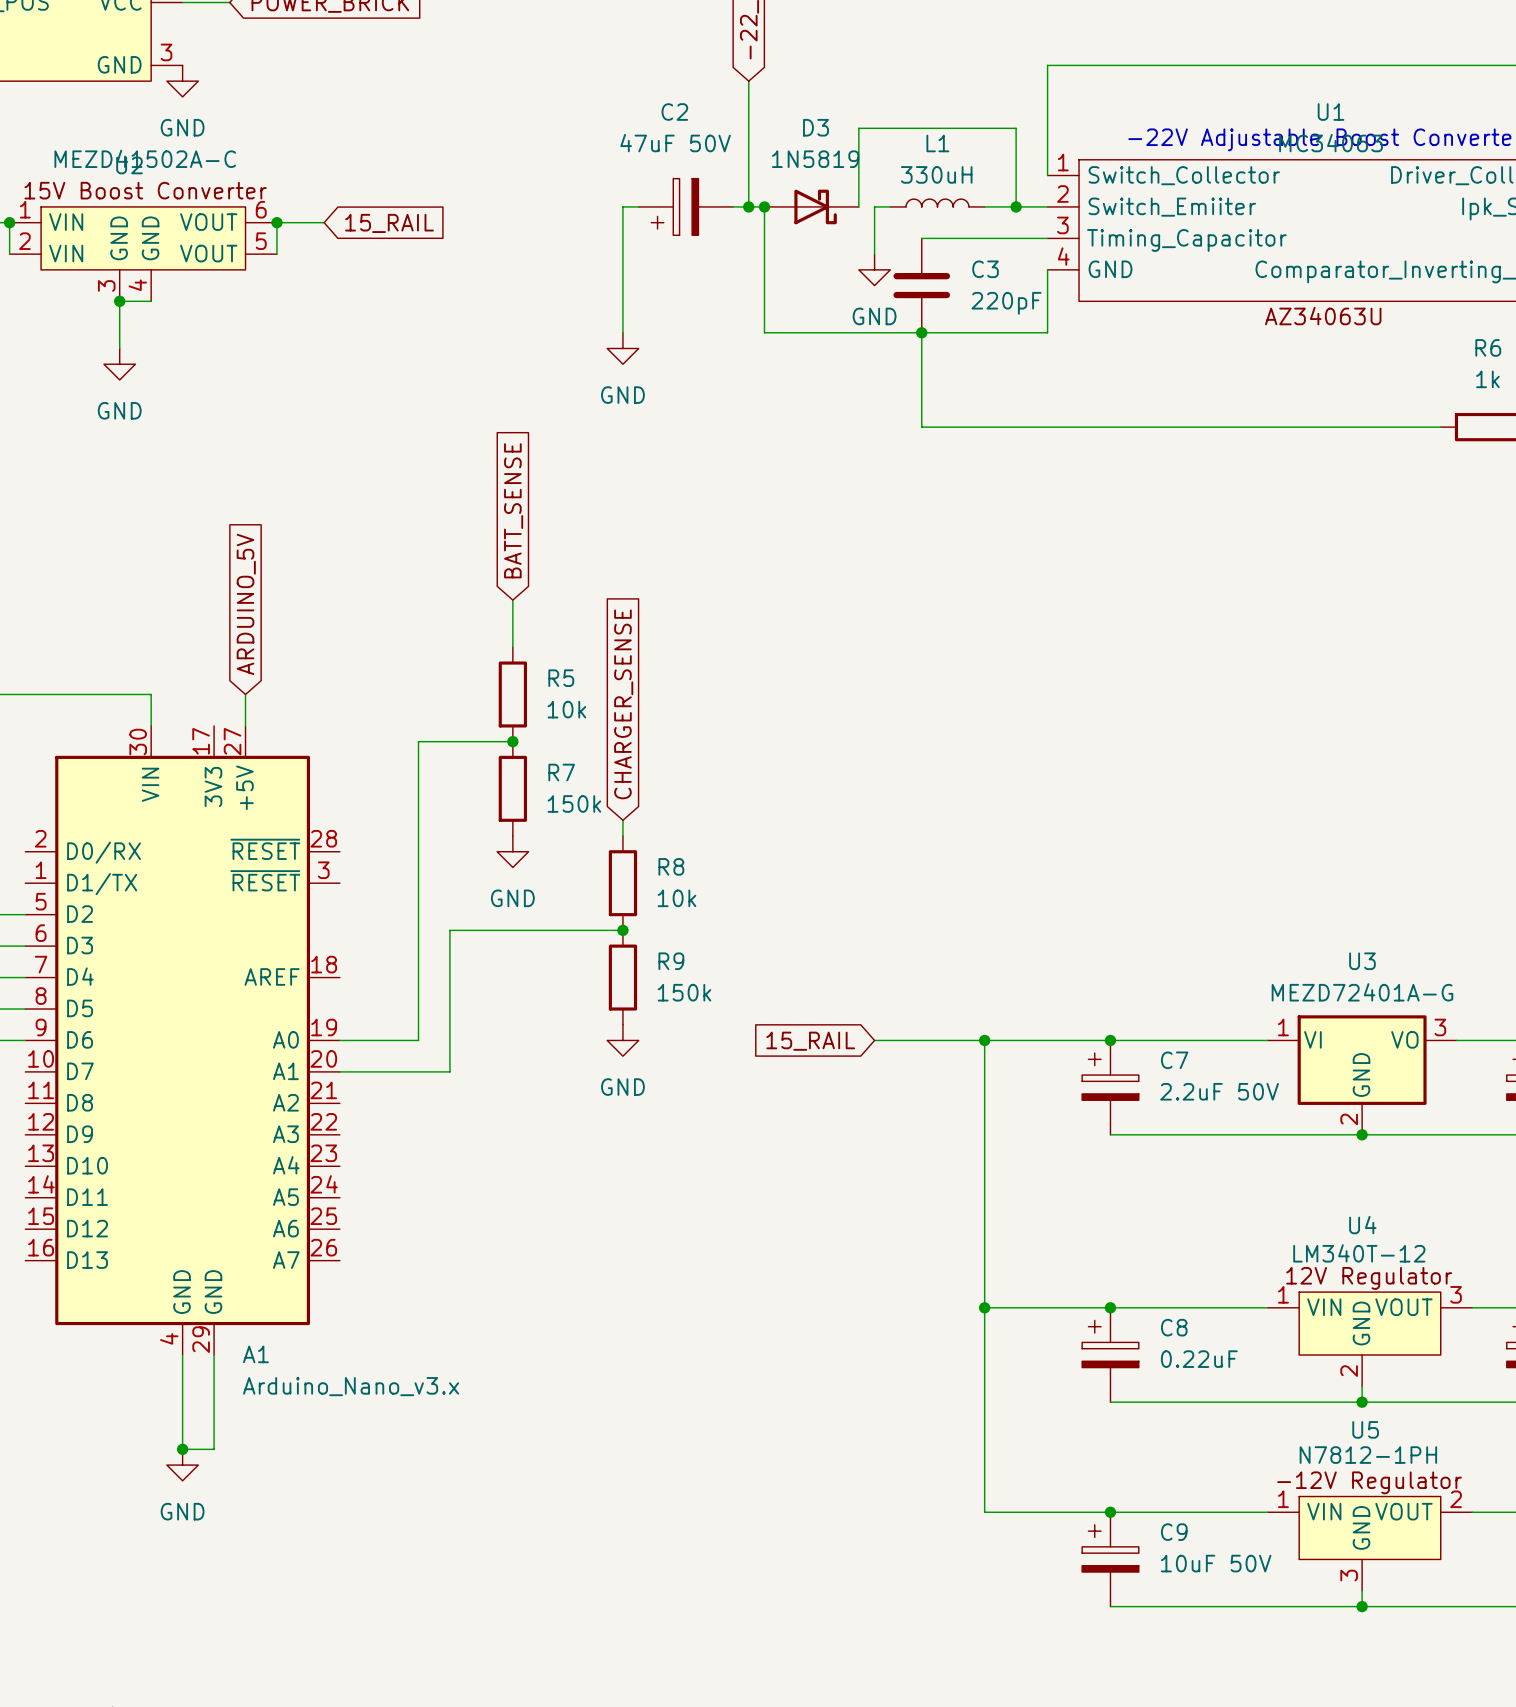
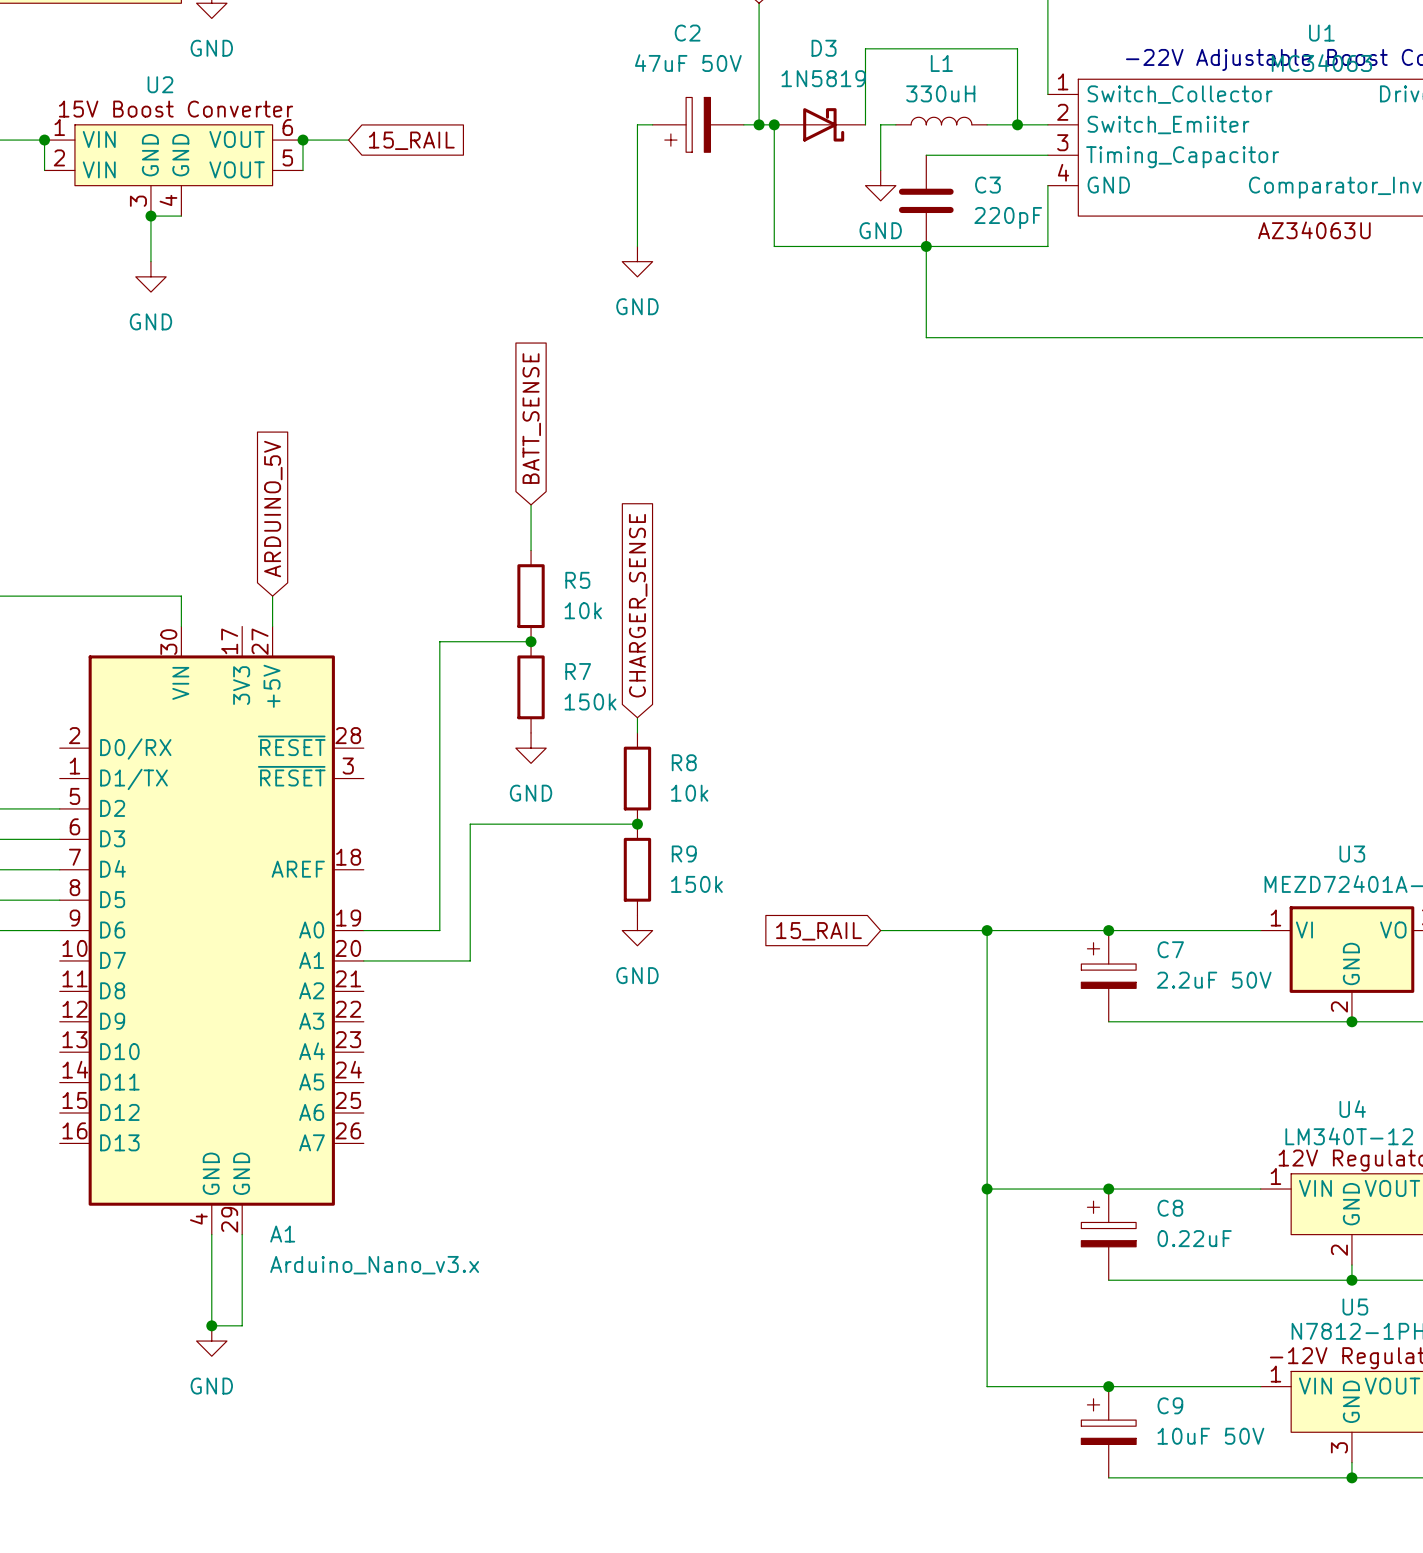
U2 value: MEZD41502A-C (145, 158) -> none

